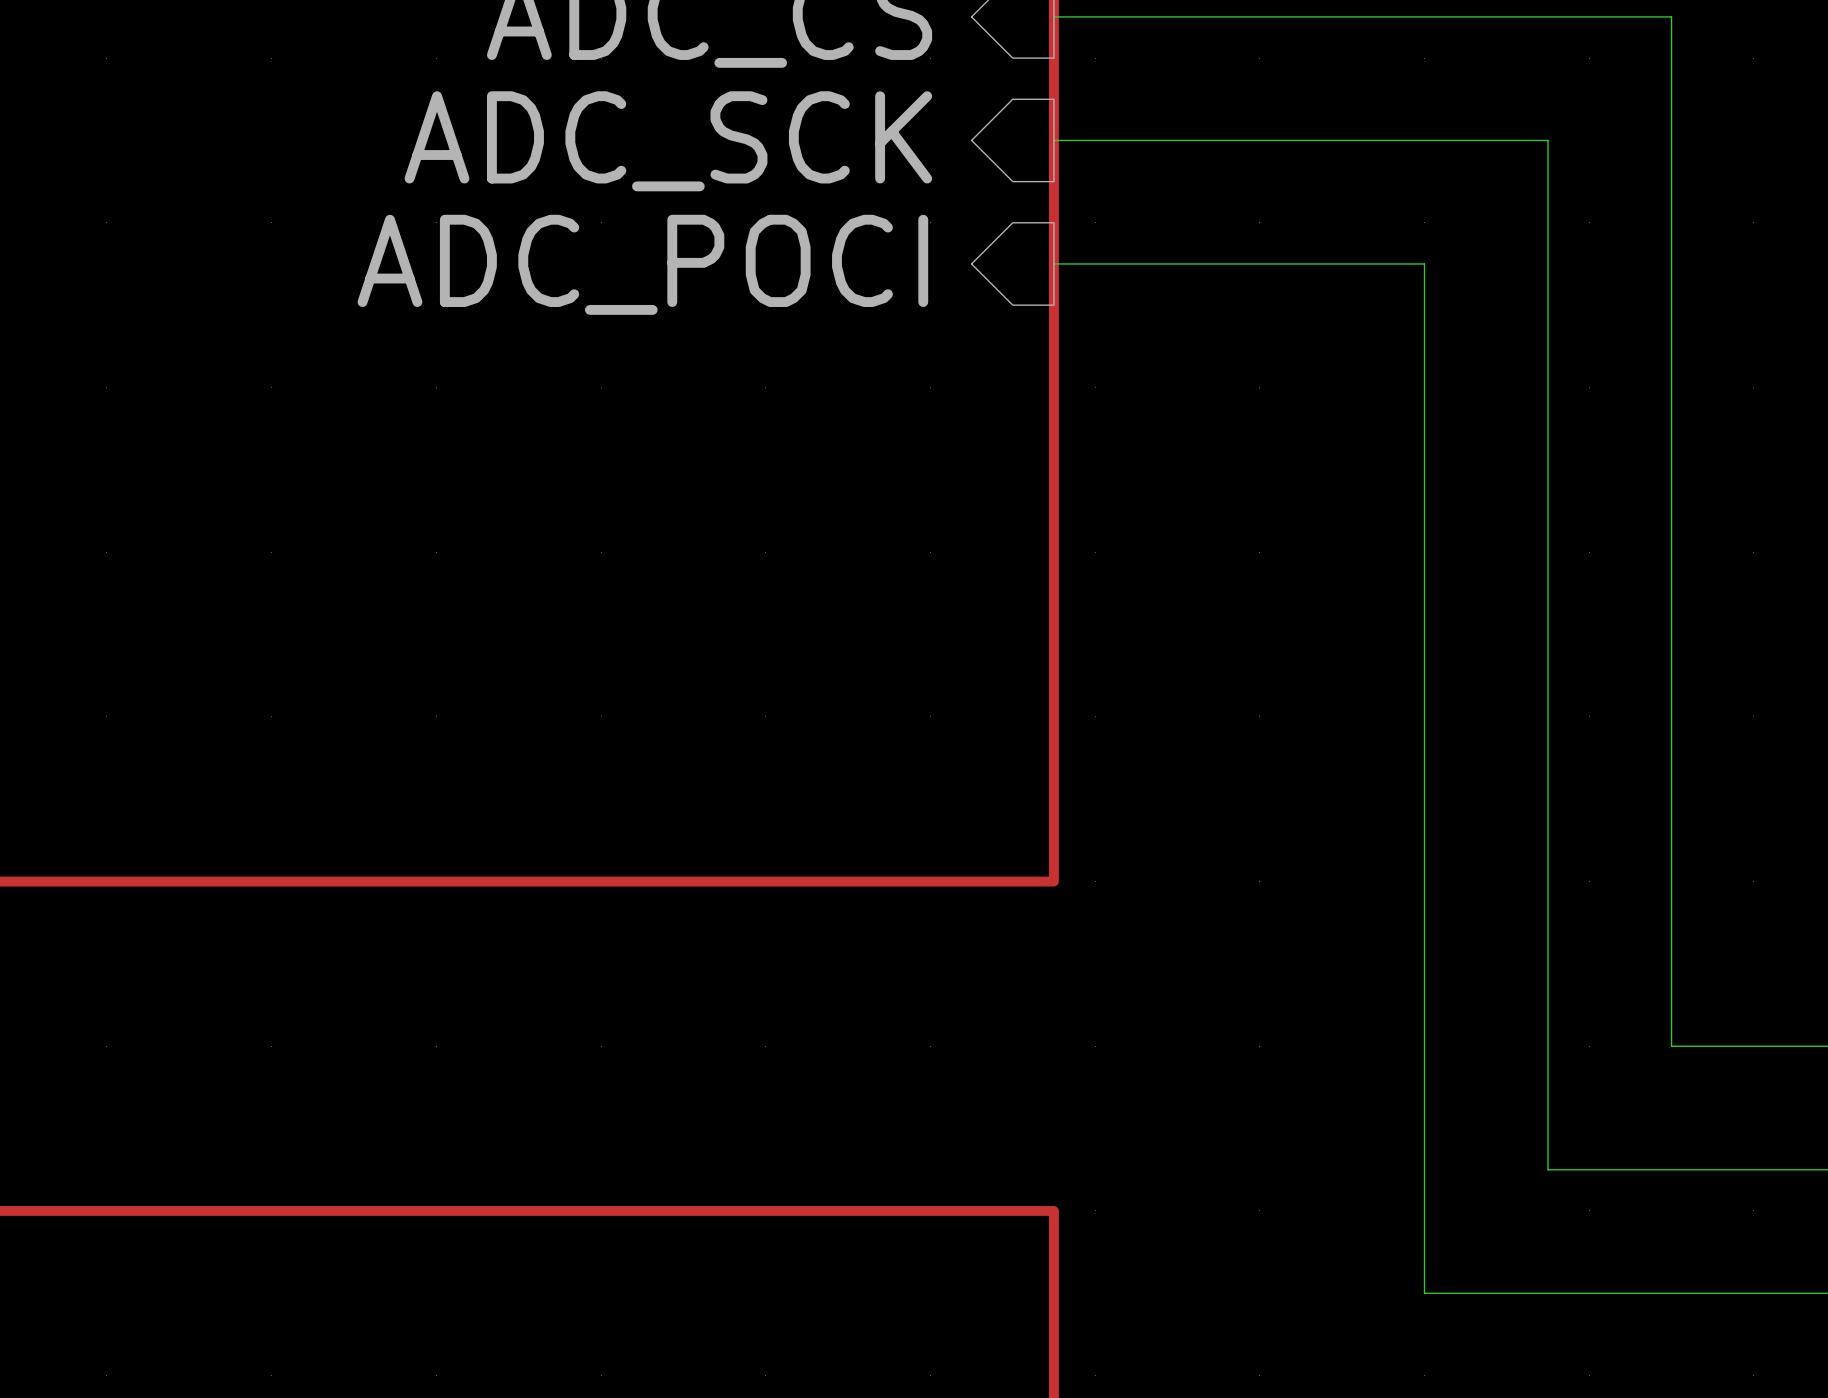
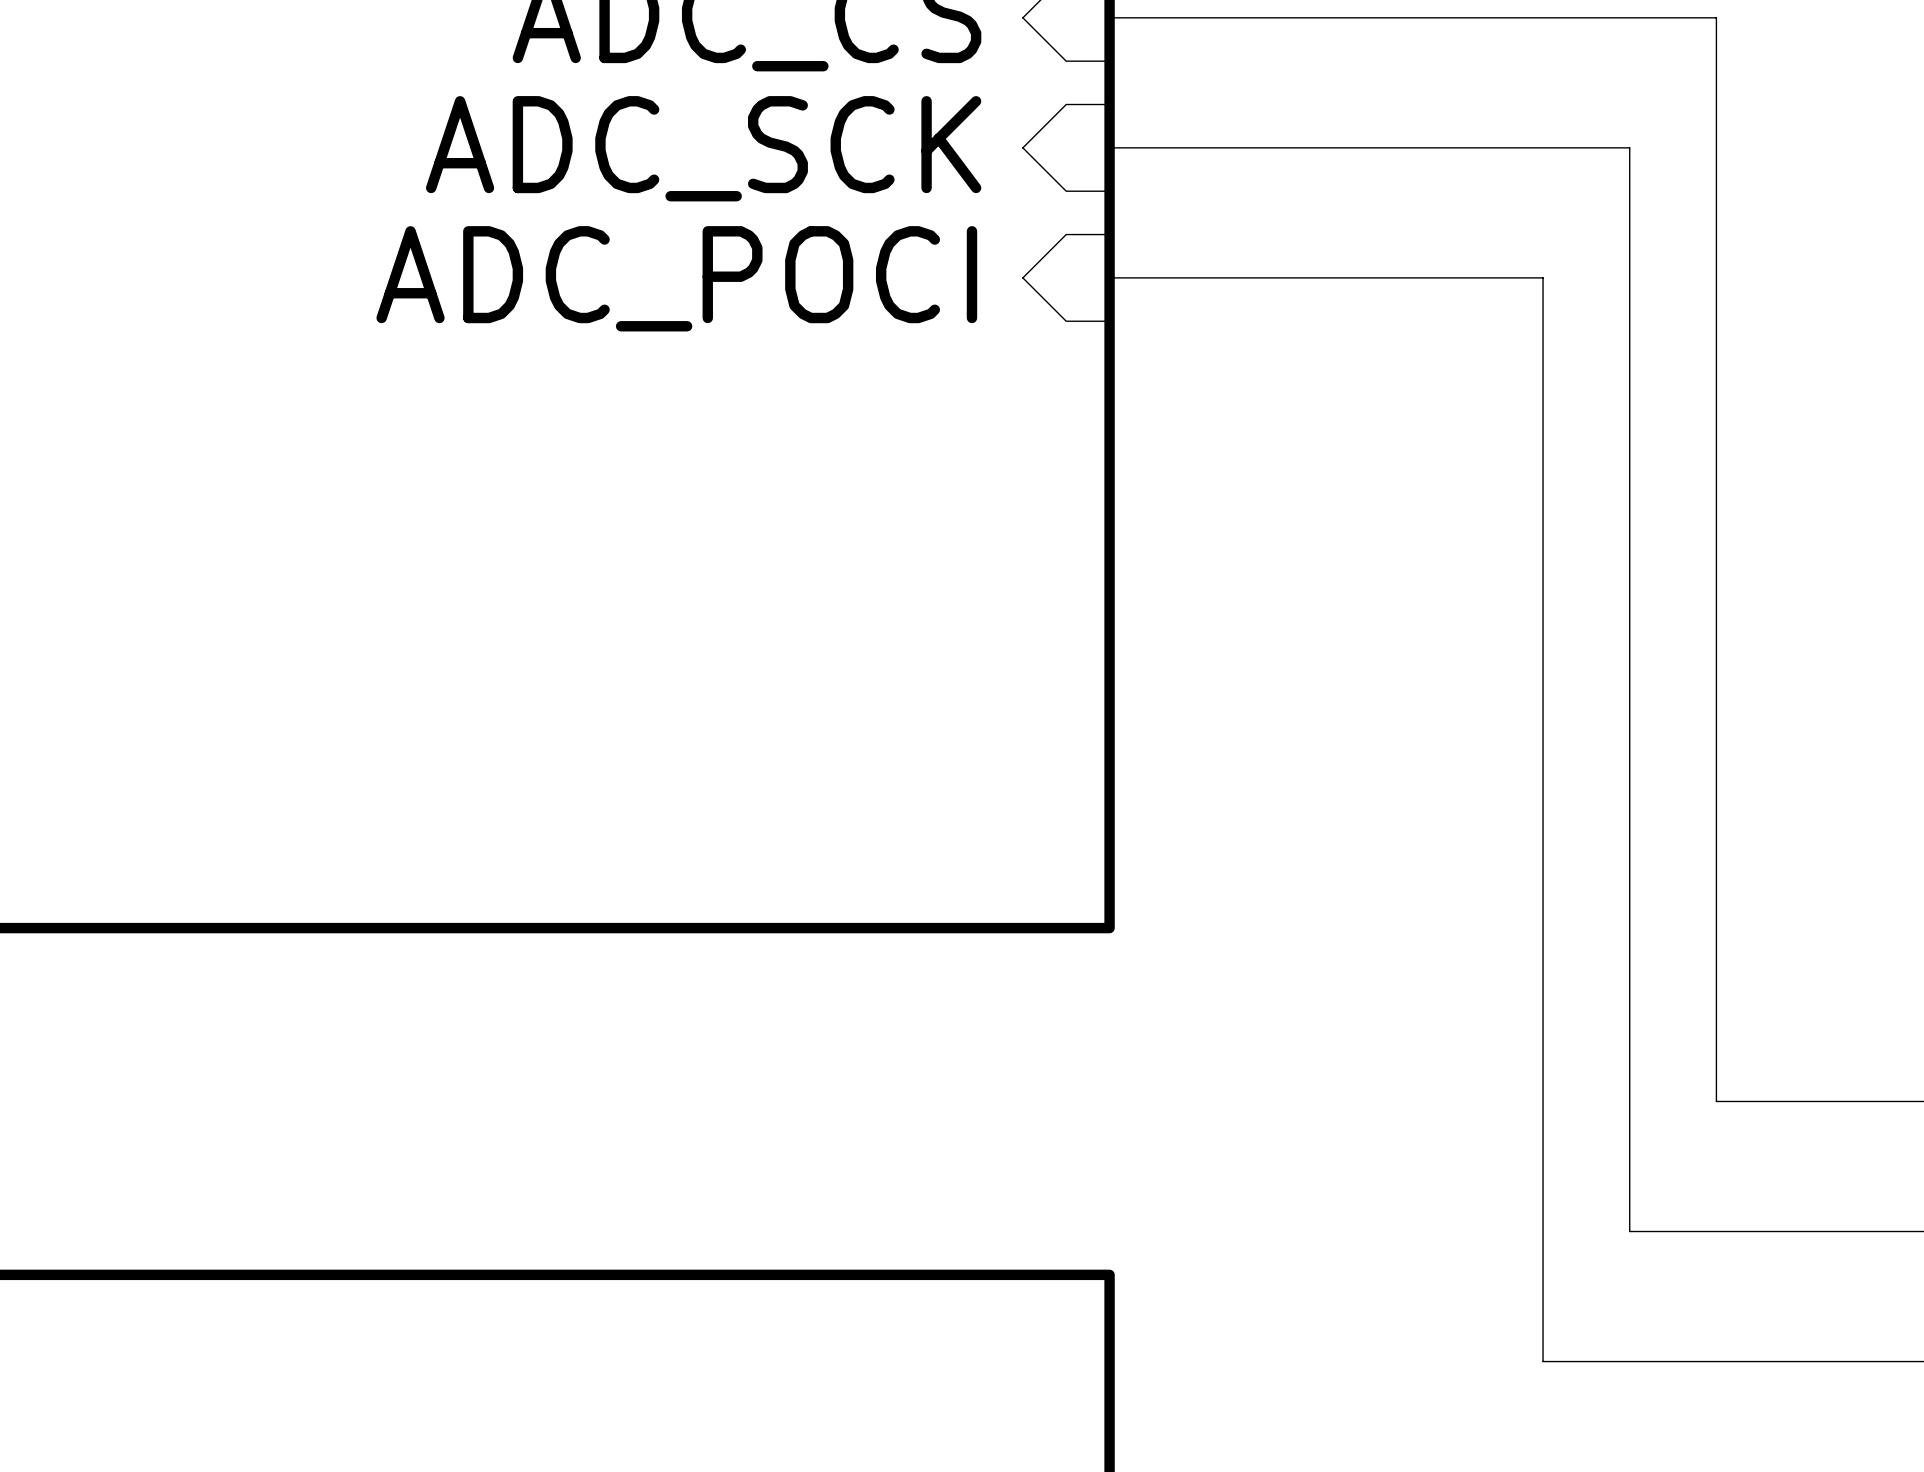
wire: (1630, 16) (1671, 16) (1671, 1046) -> (1716, 17) (1716, 1101) (1759, 1101)
wire: (1424, 263) (1424, 1293) (1465, 1293) -> (1499, 277) (1543, 277) (1543, 1361)

